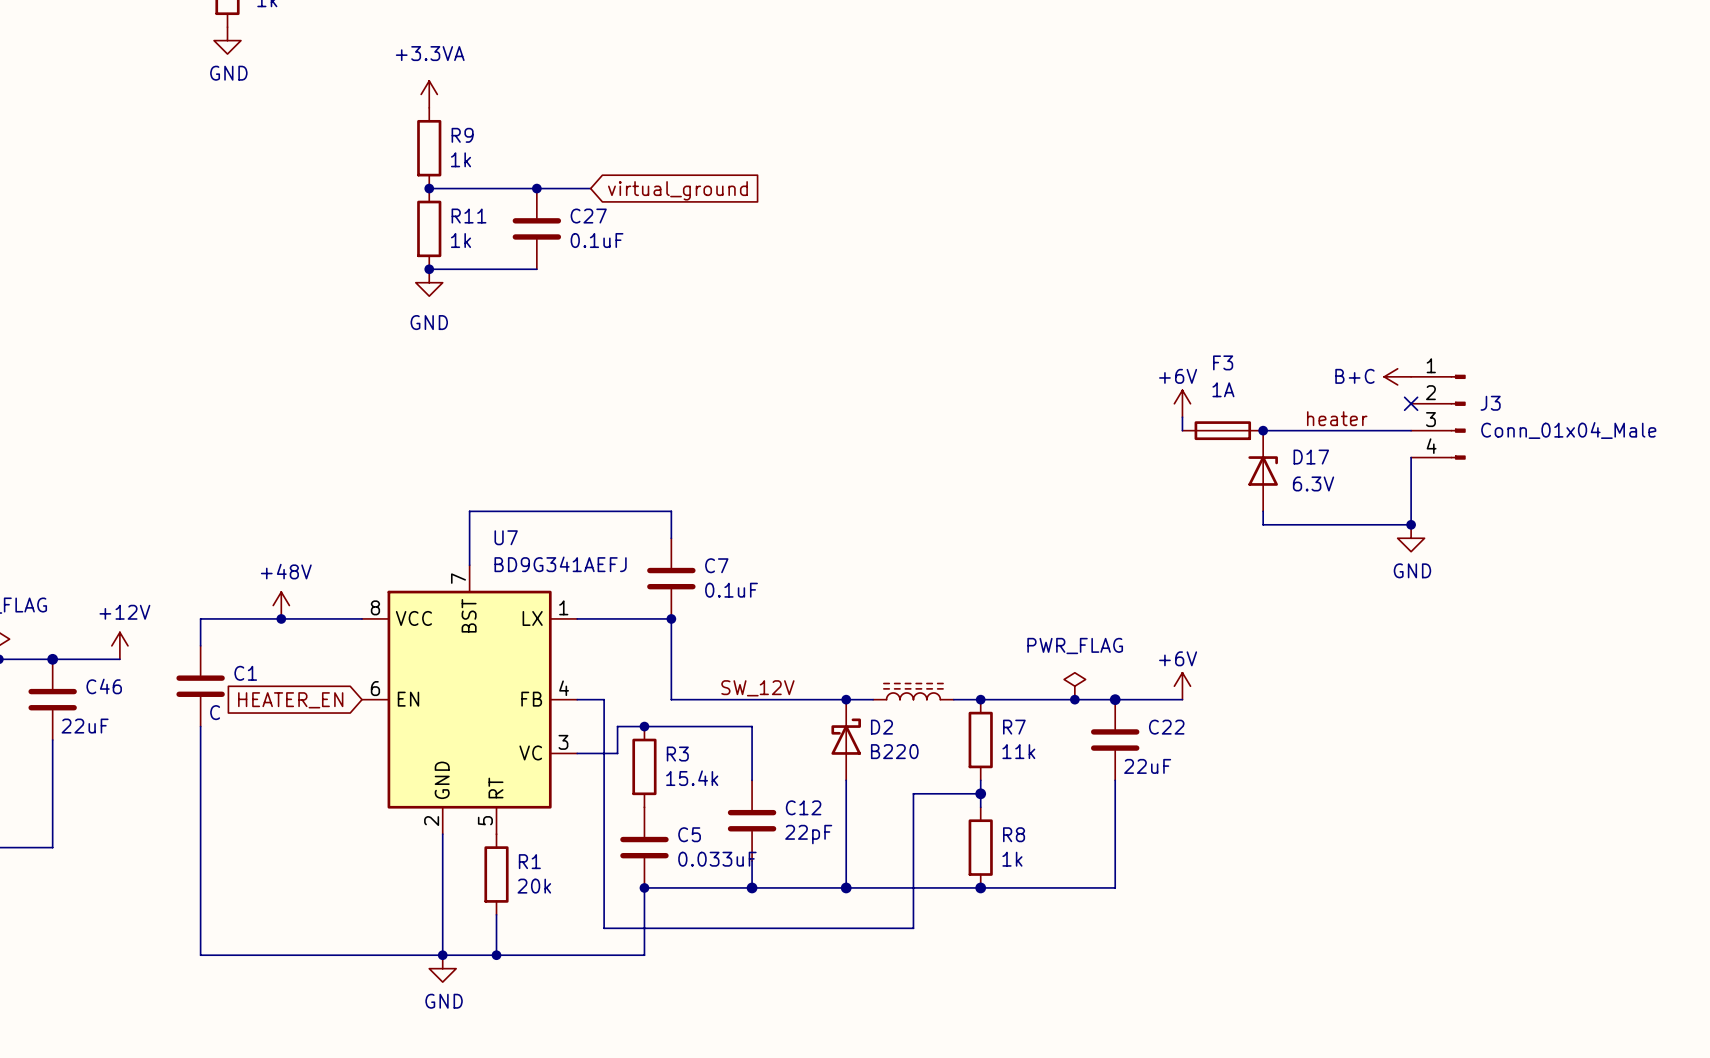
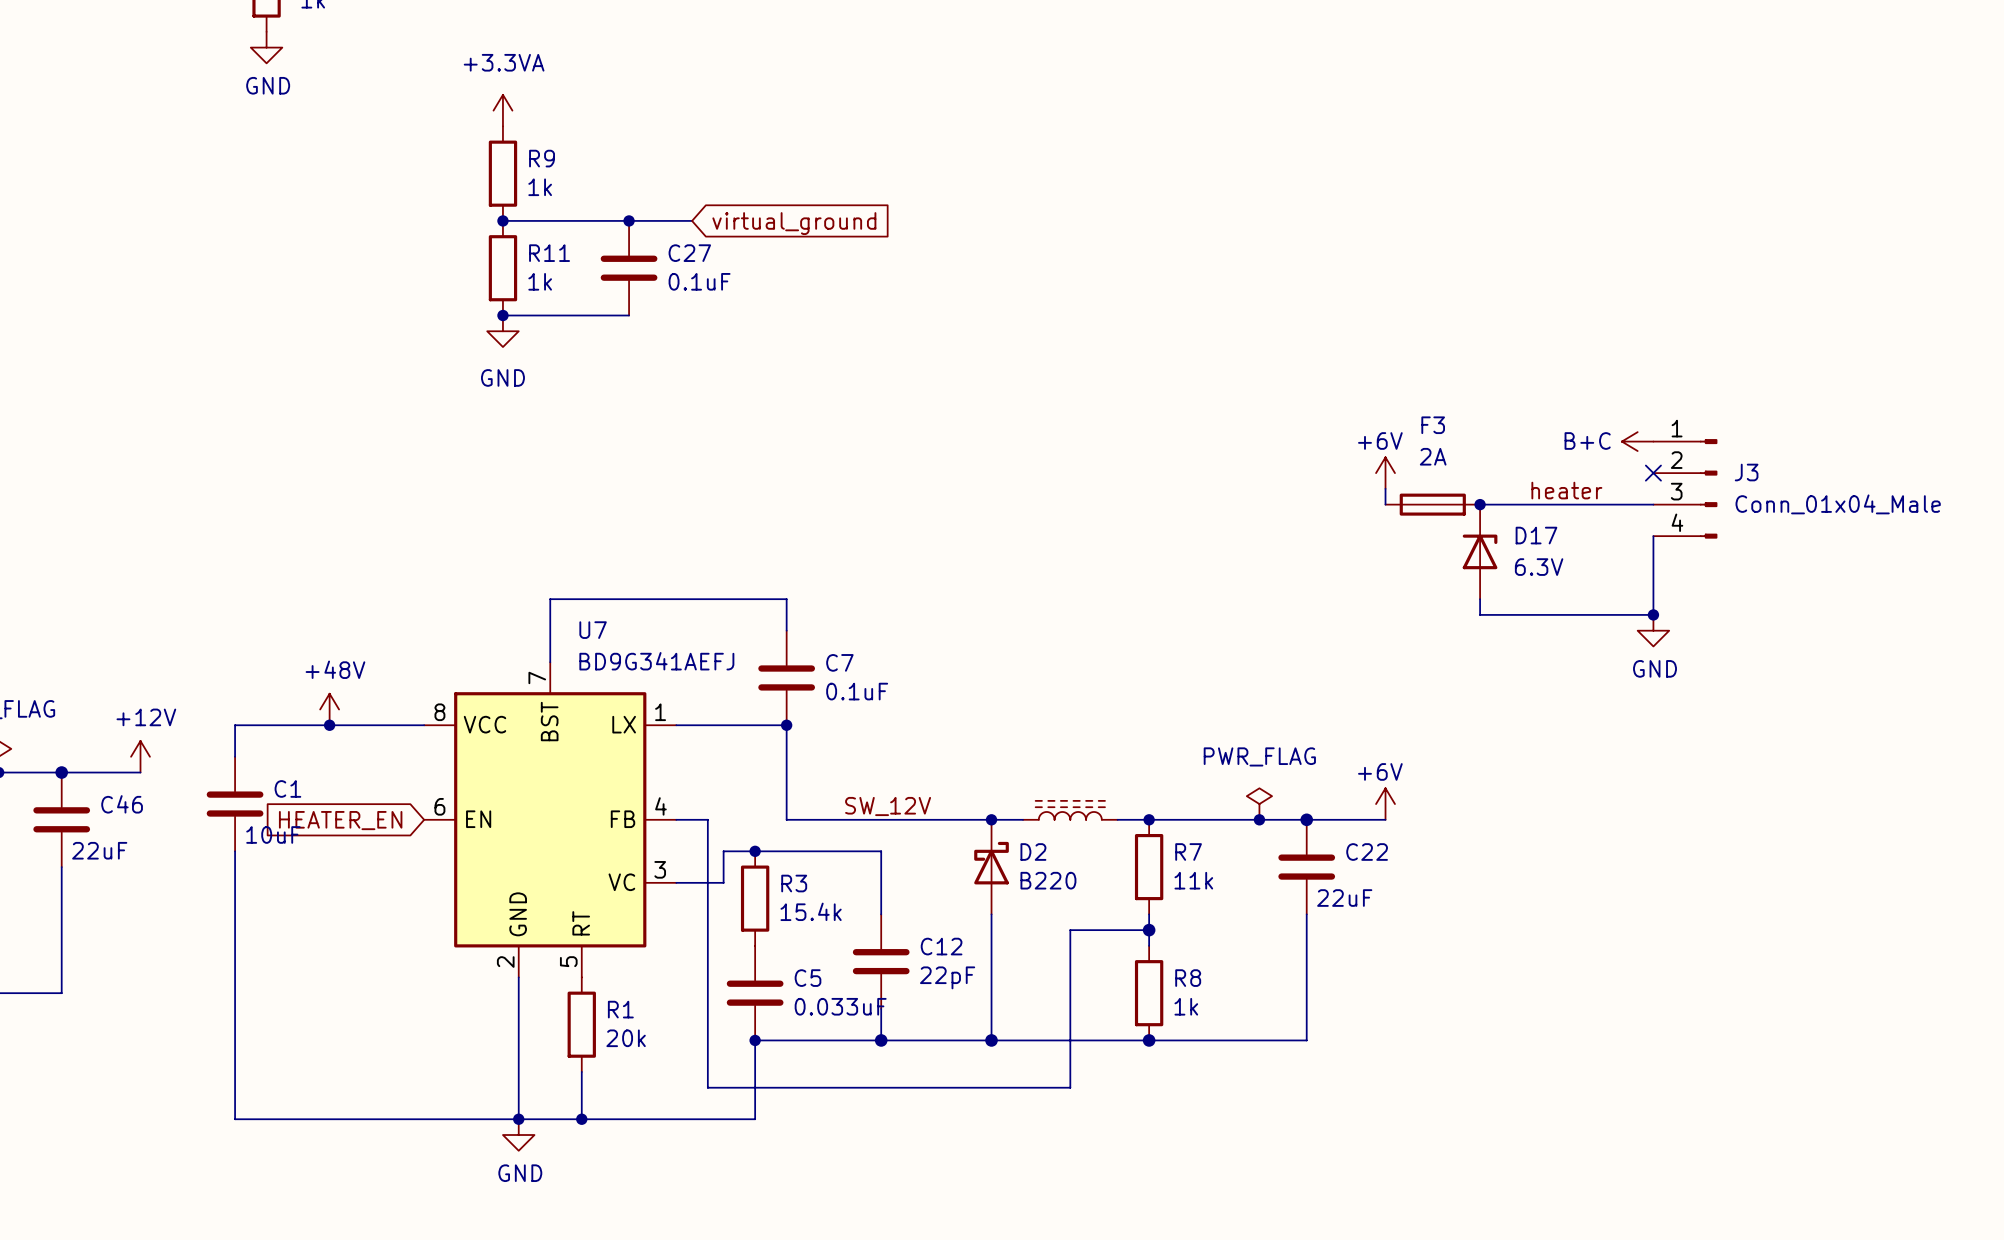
F3 value: 1A (1223, 389) -> 2A (1433, 456)
C1 value: C (215, 712) -> 10uF (273, 834)

